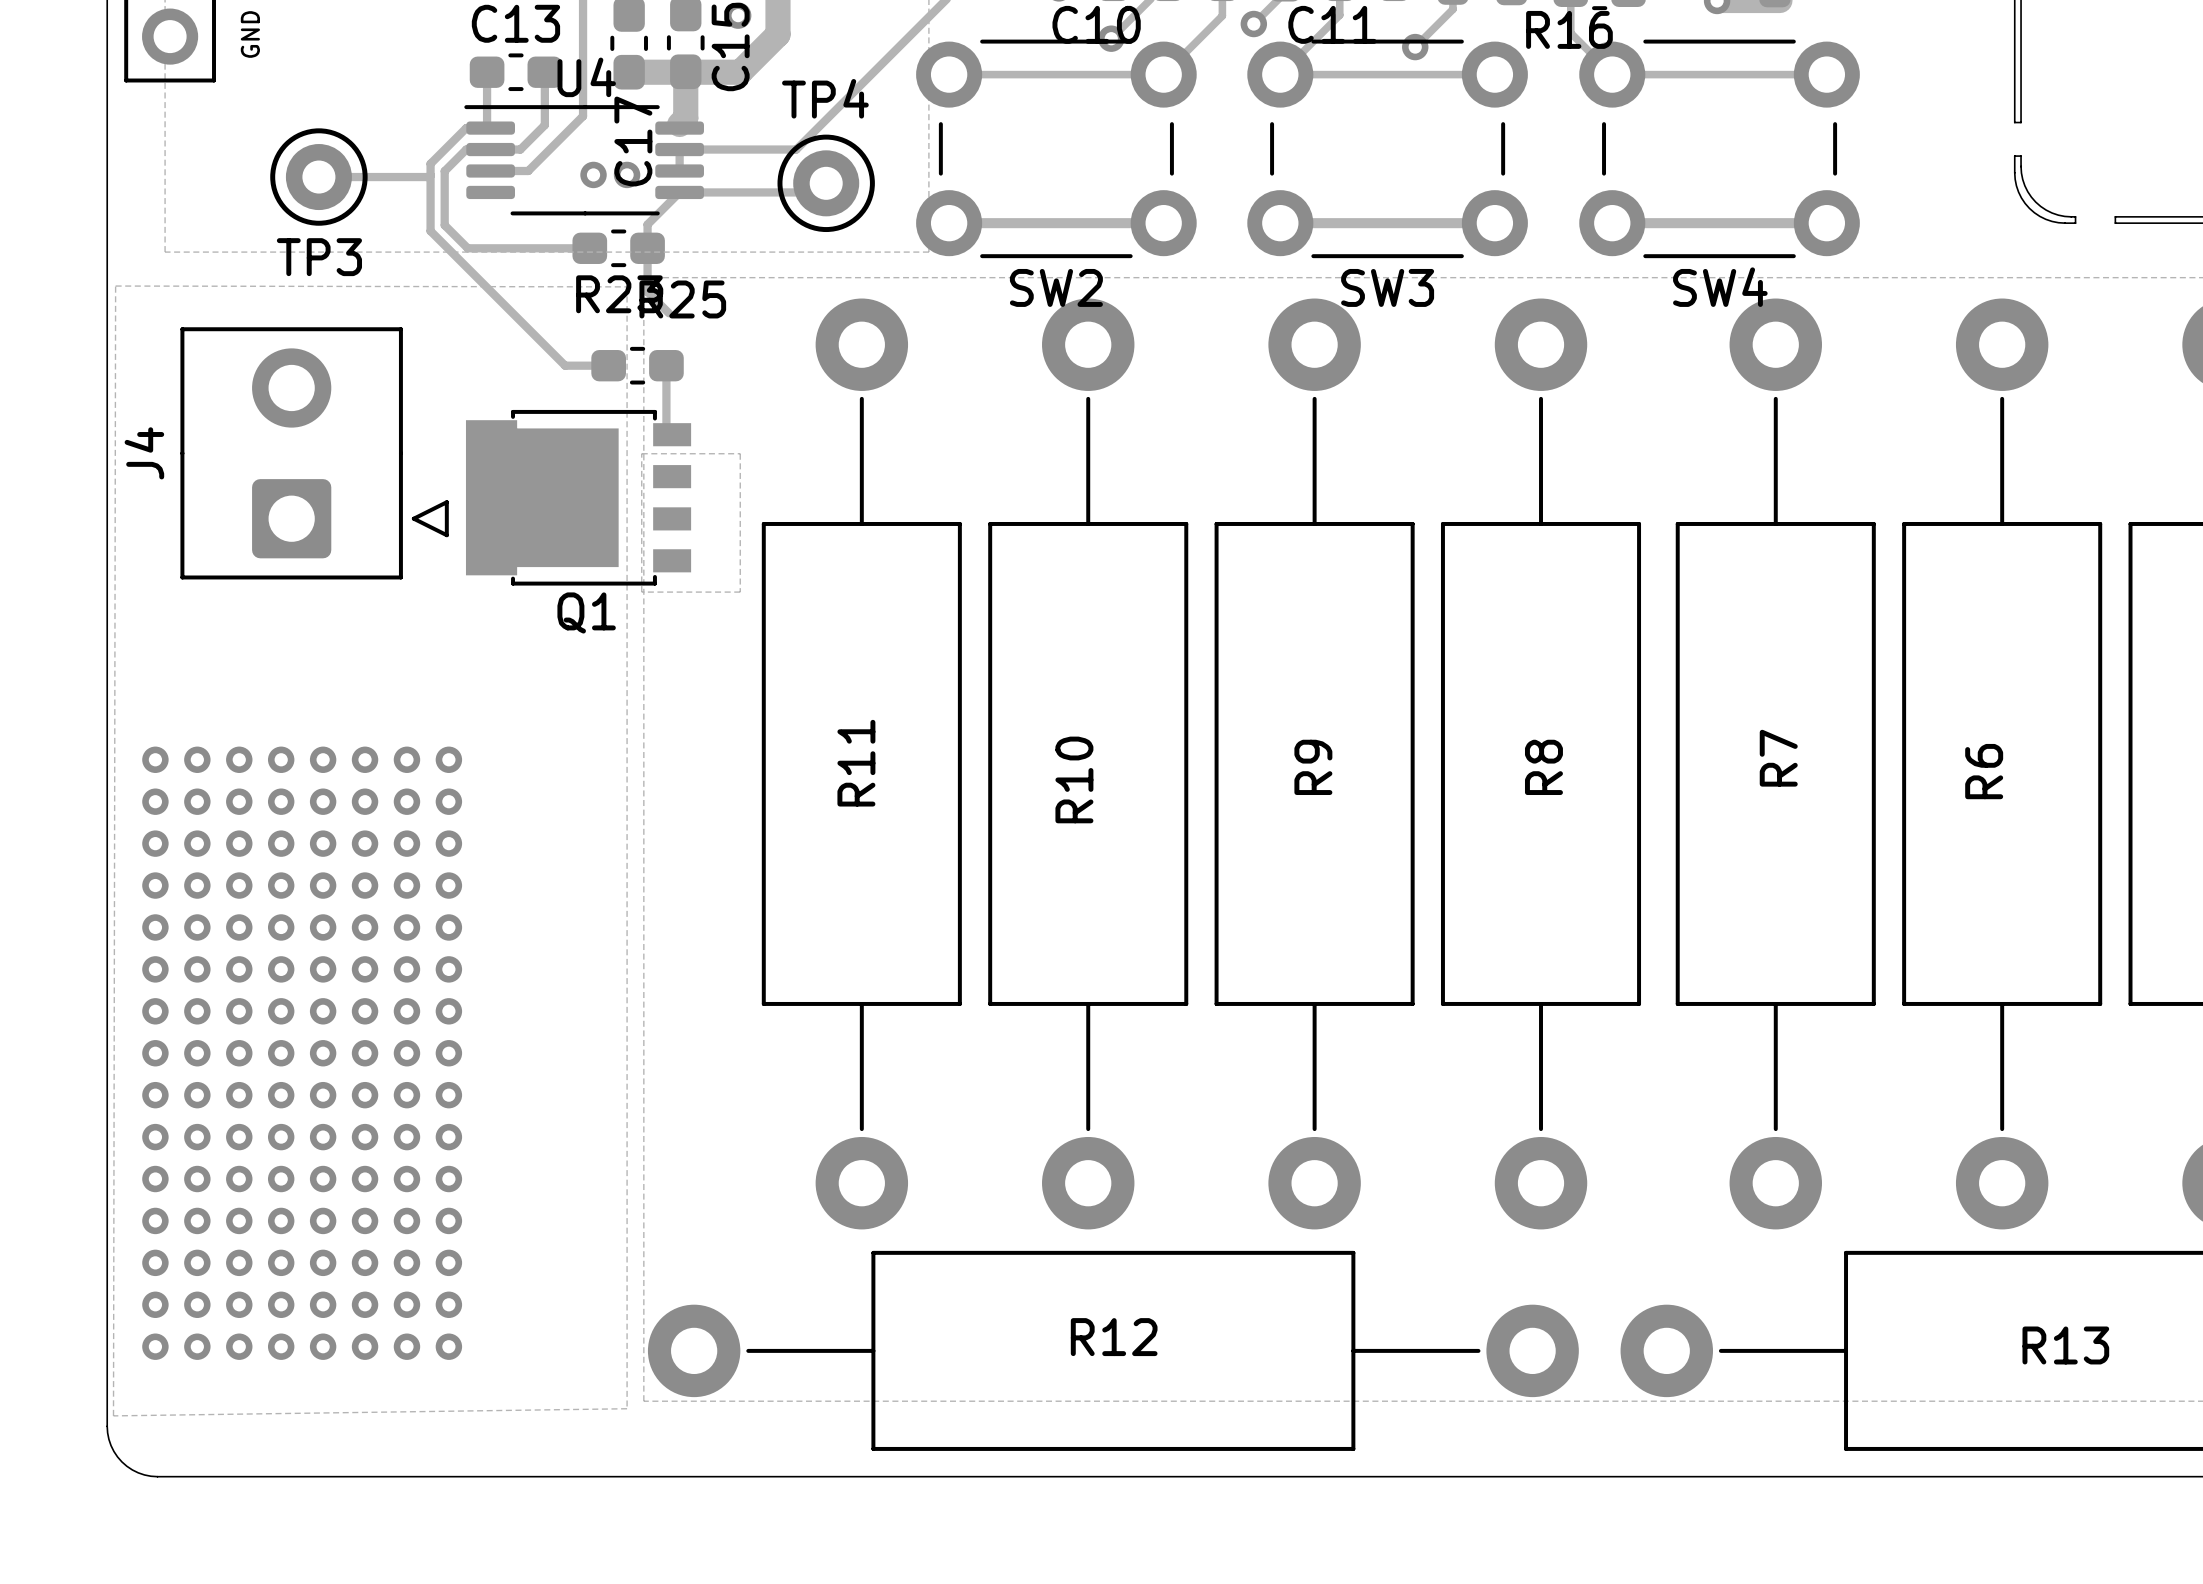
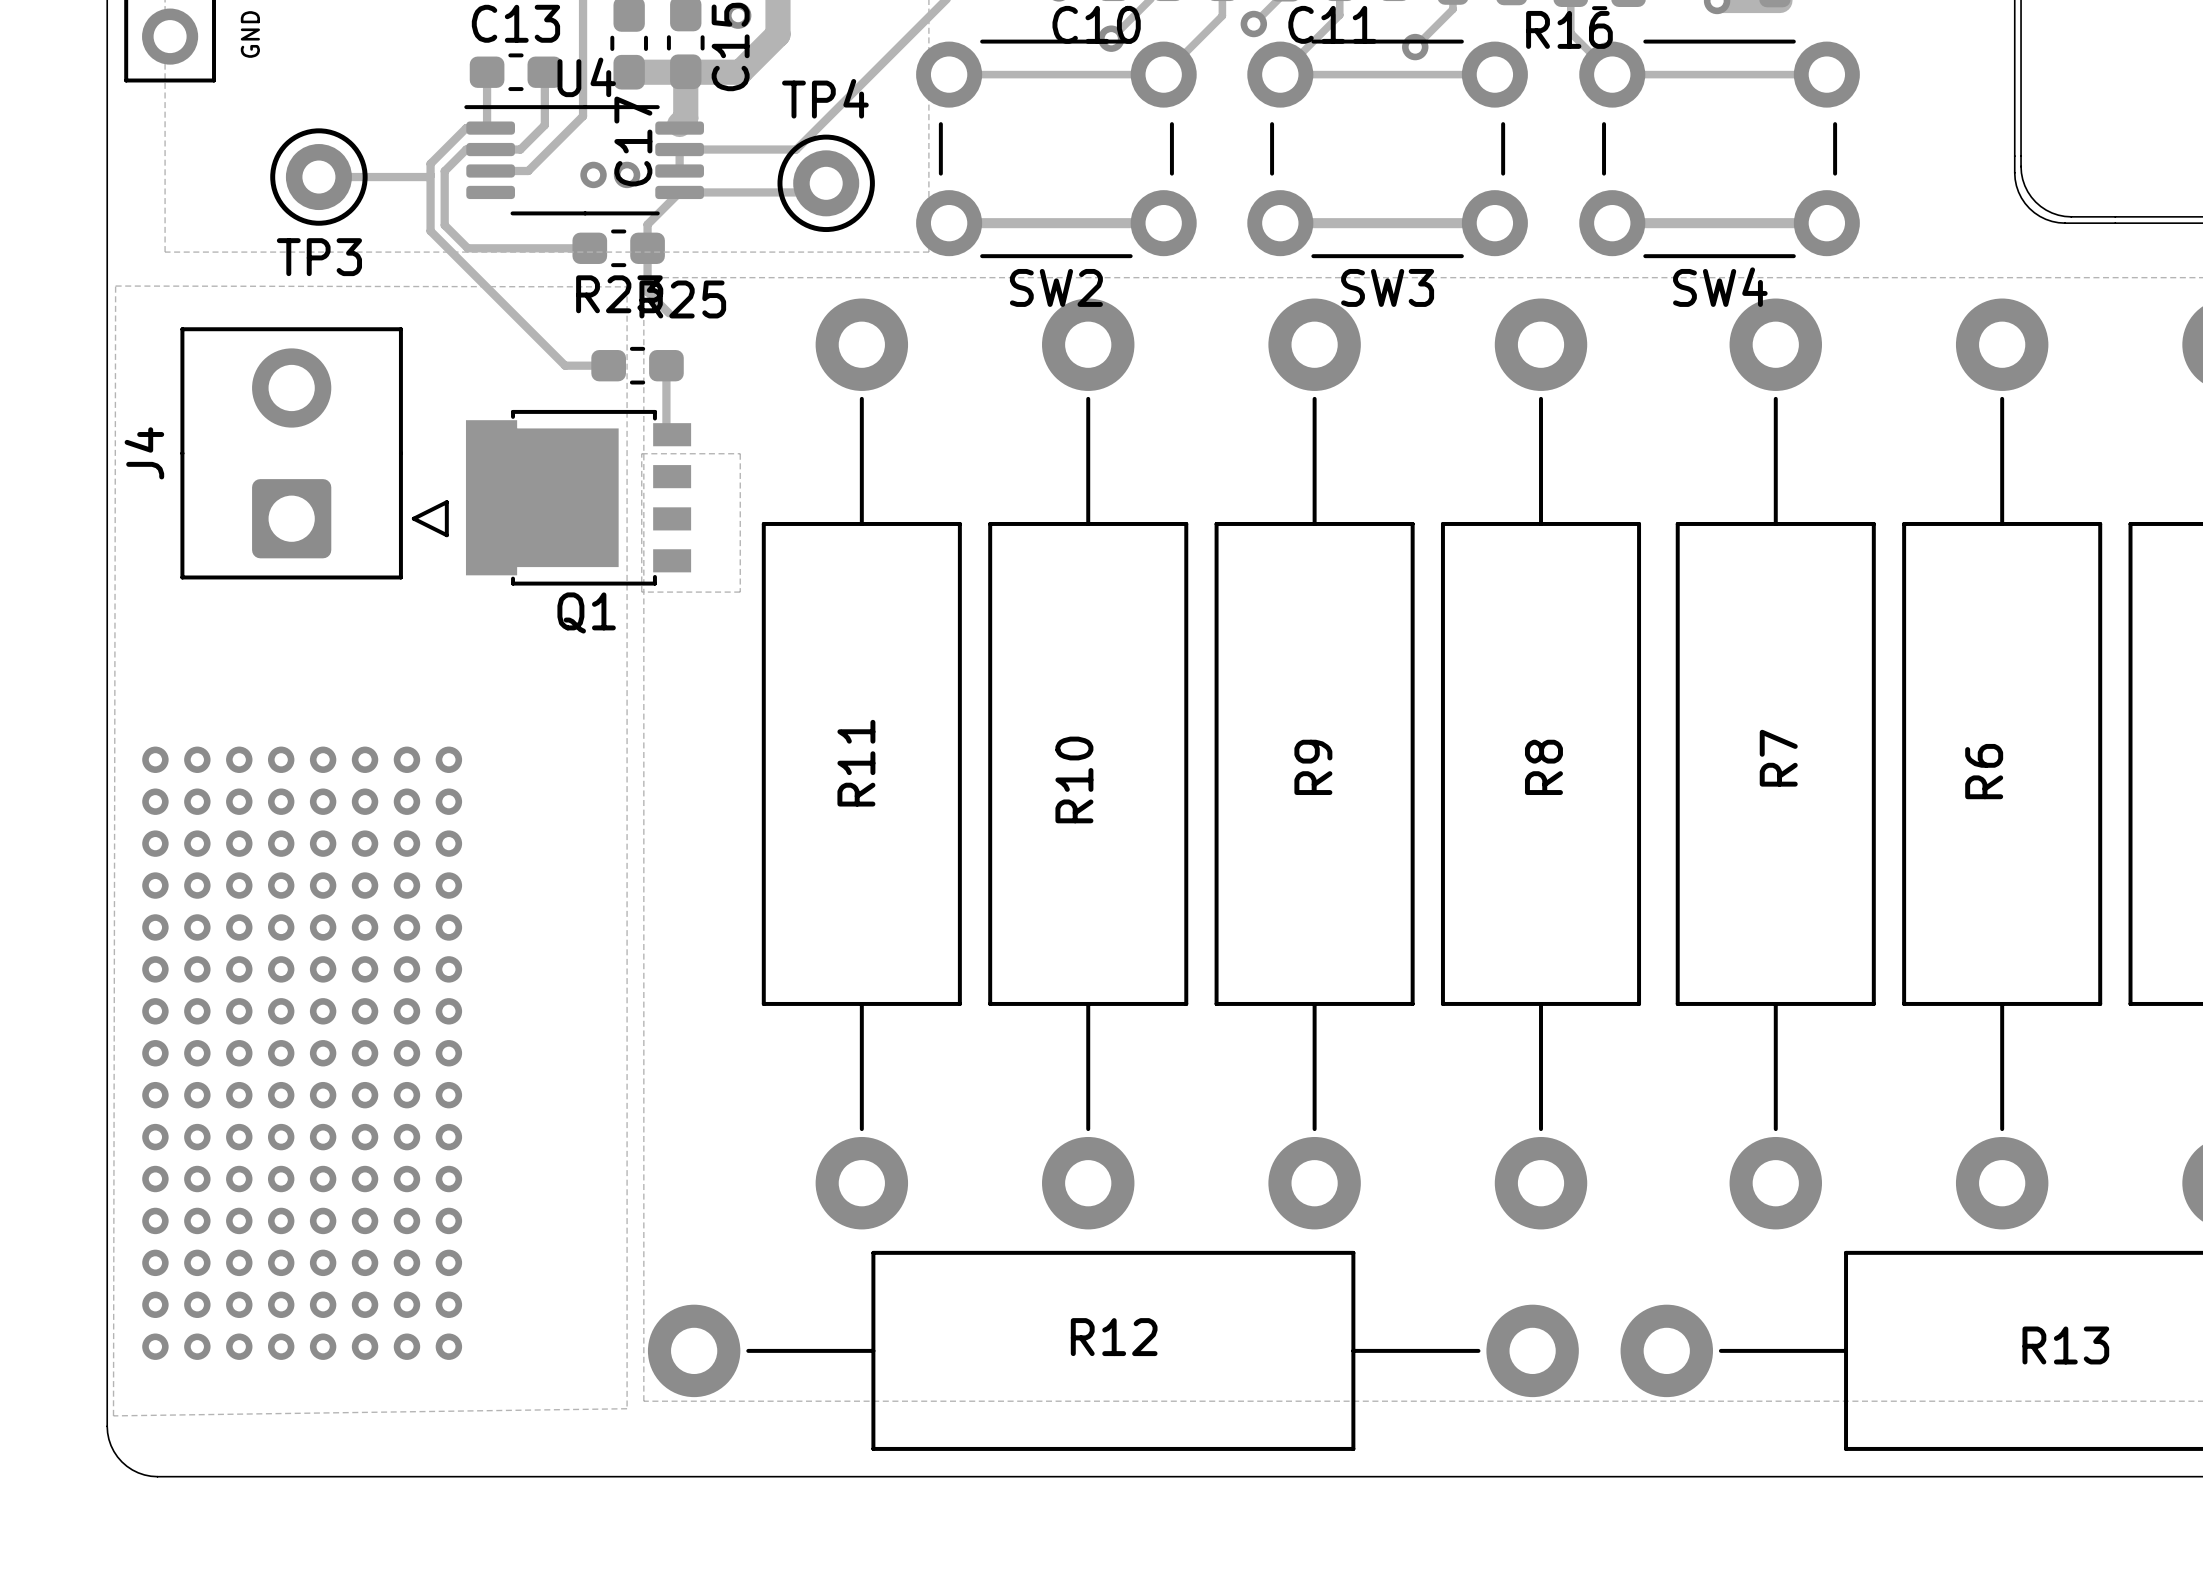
board edge: (2014, 122) (2021, 122) -> (2014, 122) (2014, 156)
board edge: (2014, 156) (2021, 156) -> (2021, 122) (2021, 156)
board edge: (2075, 216) (2075, 223) -> (2075, 216) (2115, 216)
board edge: (2115, 216) (2115, 223) -> (2075, 223) (2115, 223)

